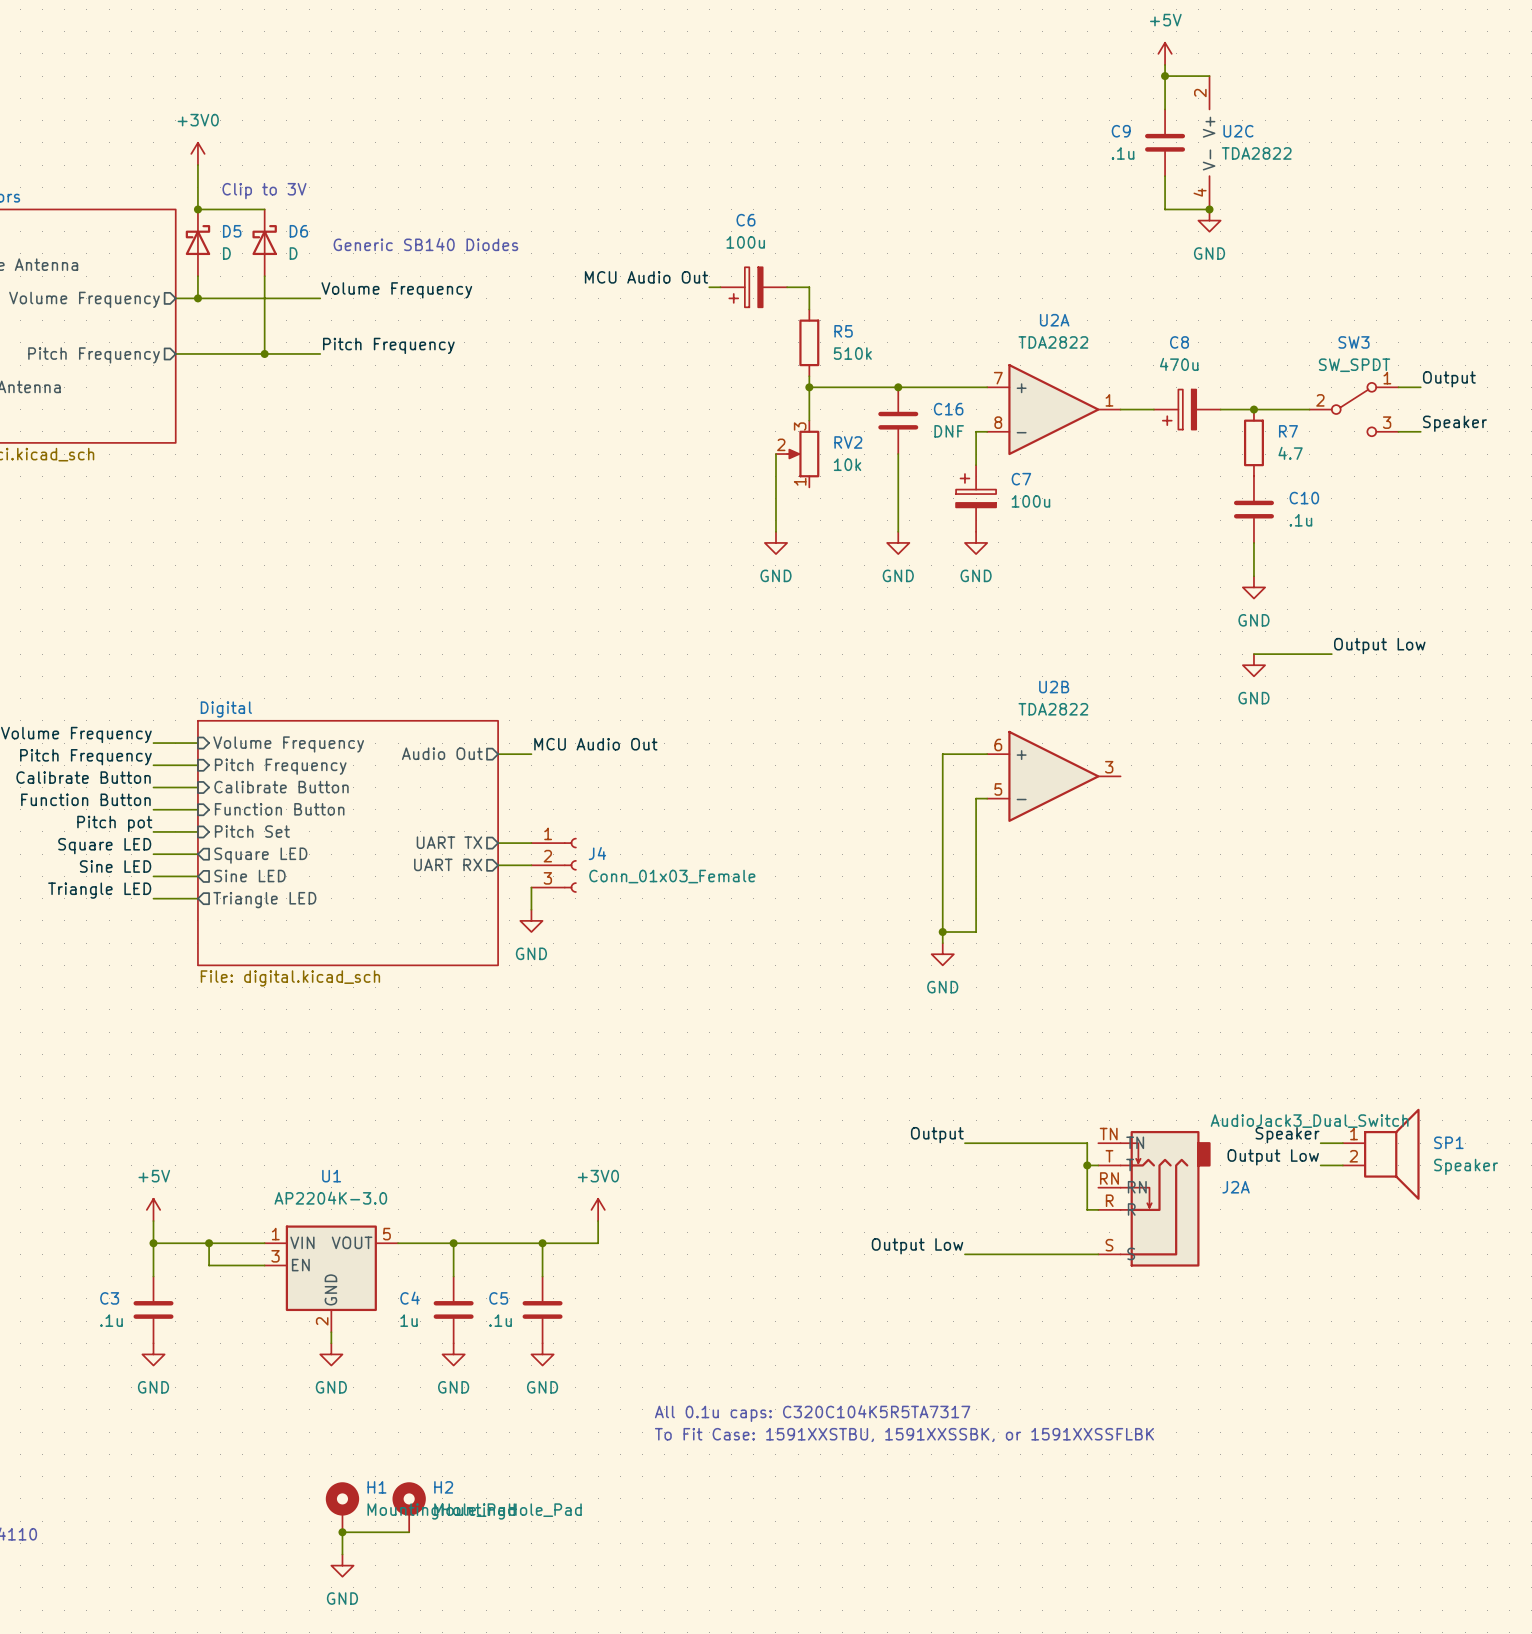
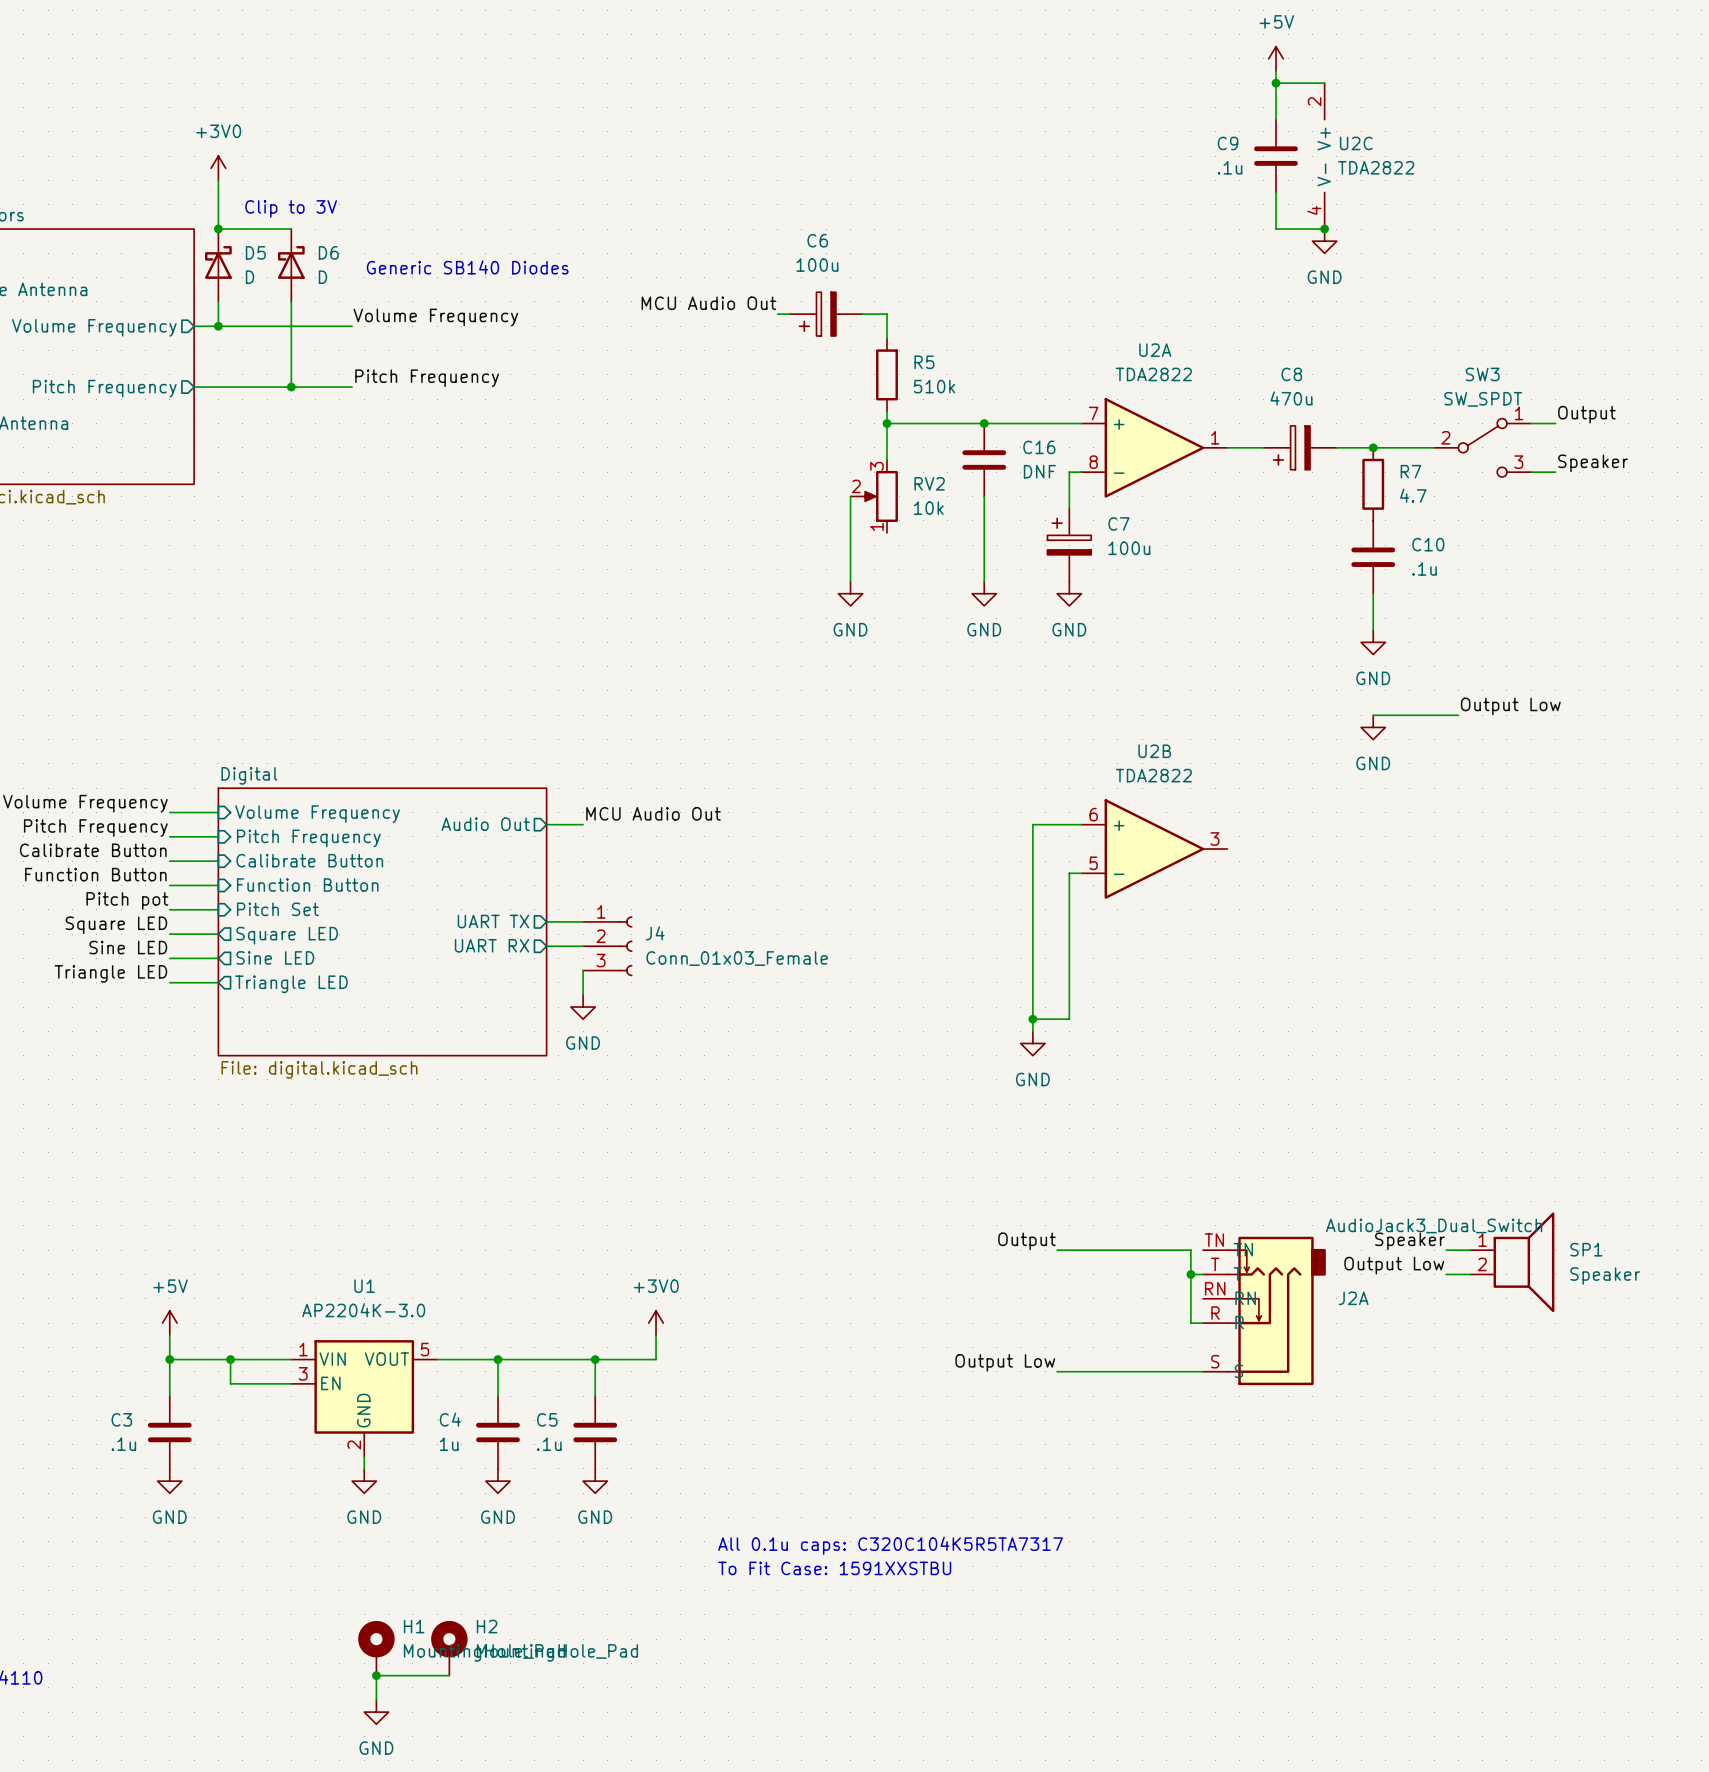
text: To Fit Case: 1591XXSTBU, 1591XXSSBK, or 1591XXSSFLBK (904, 1435) -> To Fit Case: 1591XXSTBU (834, 1568)

